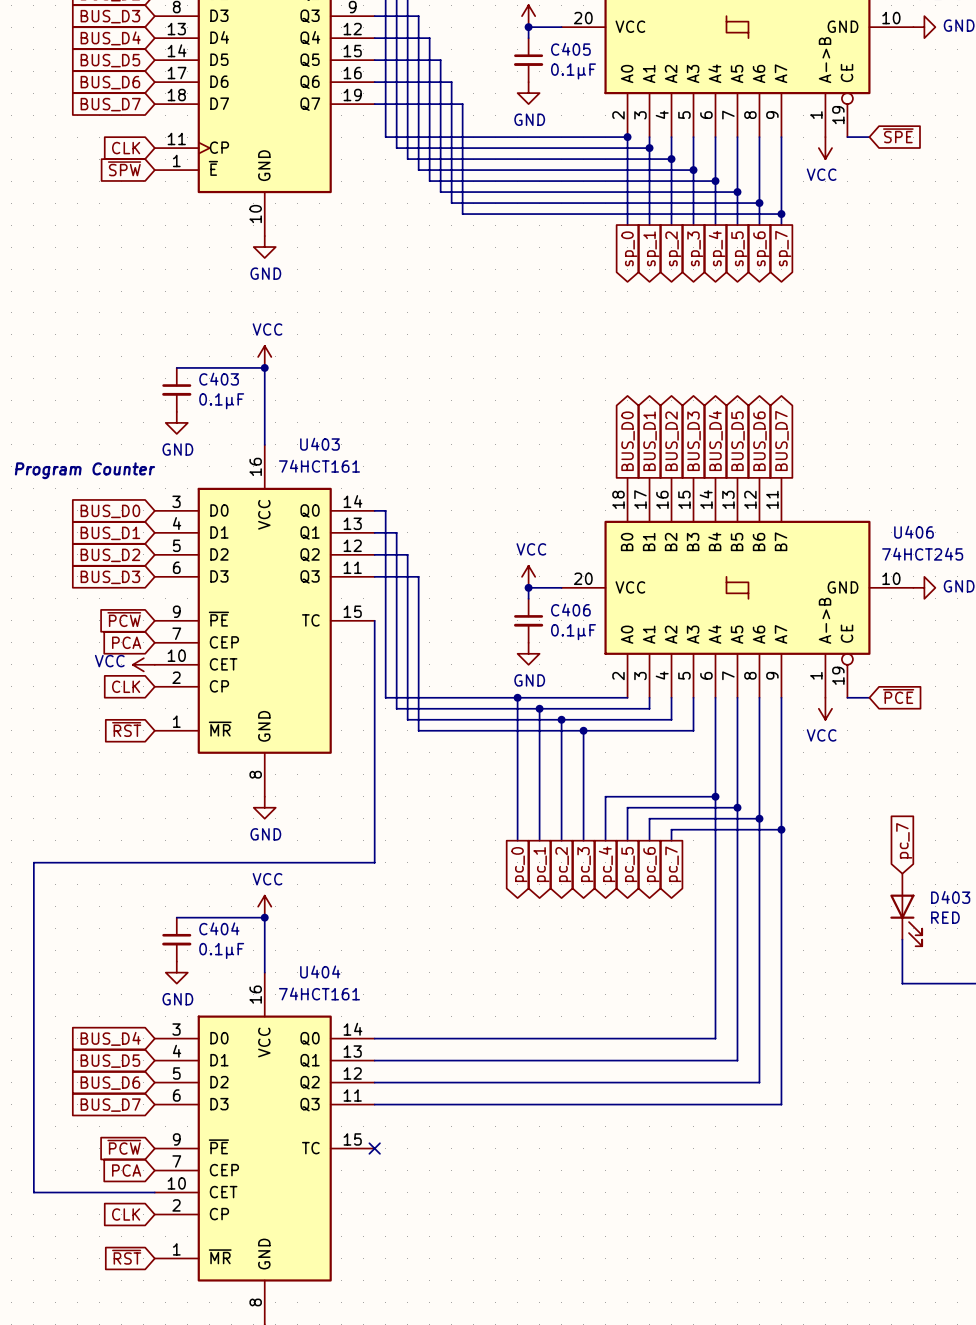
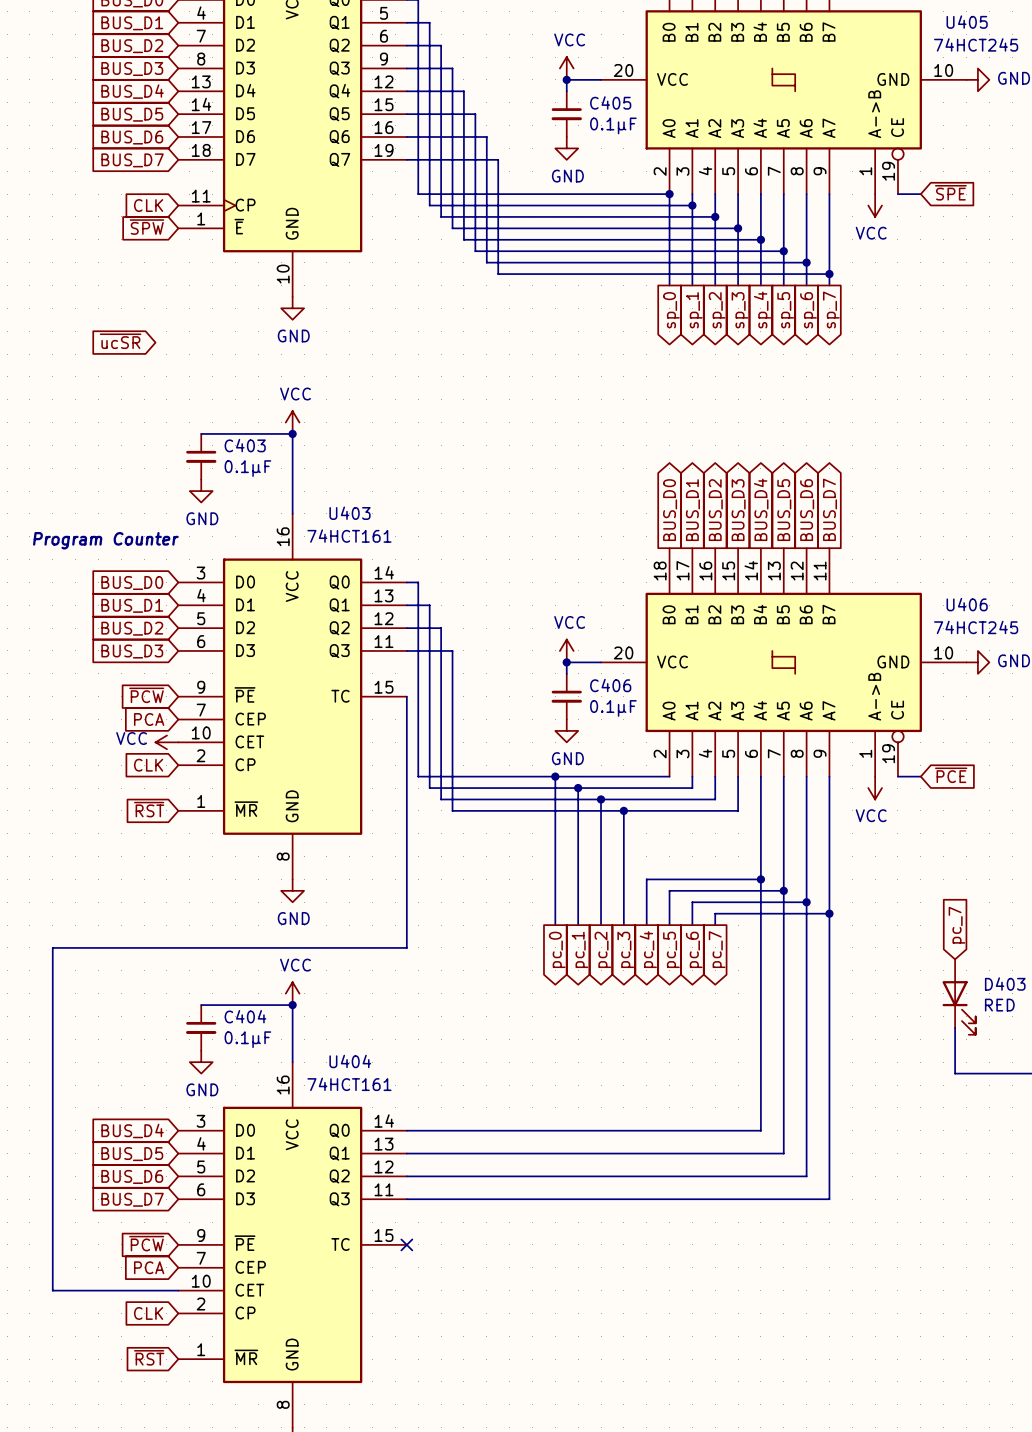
global label: none -> ~{ucSR} (120, 341)

